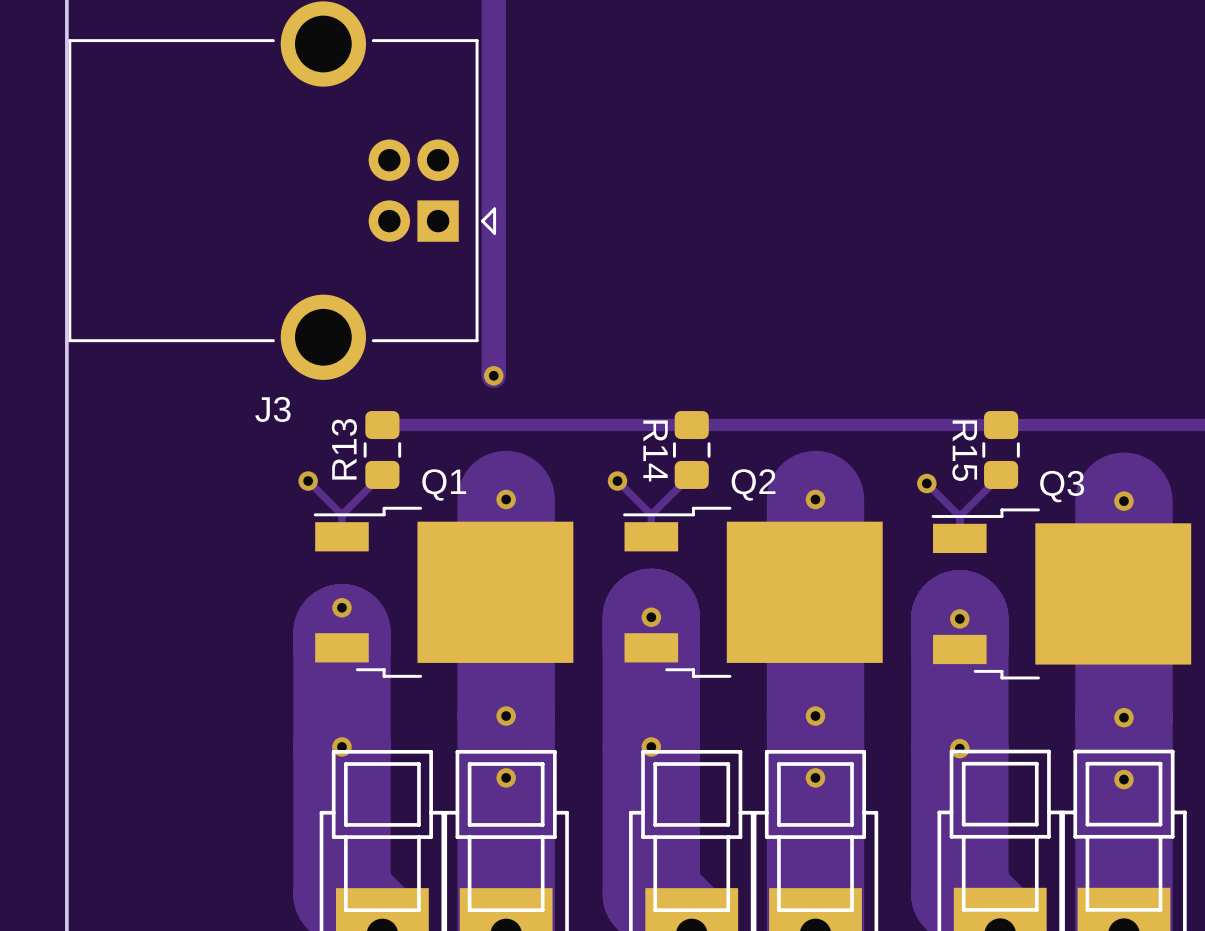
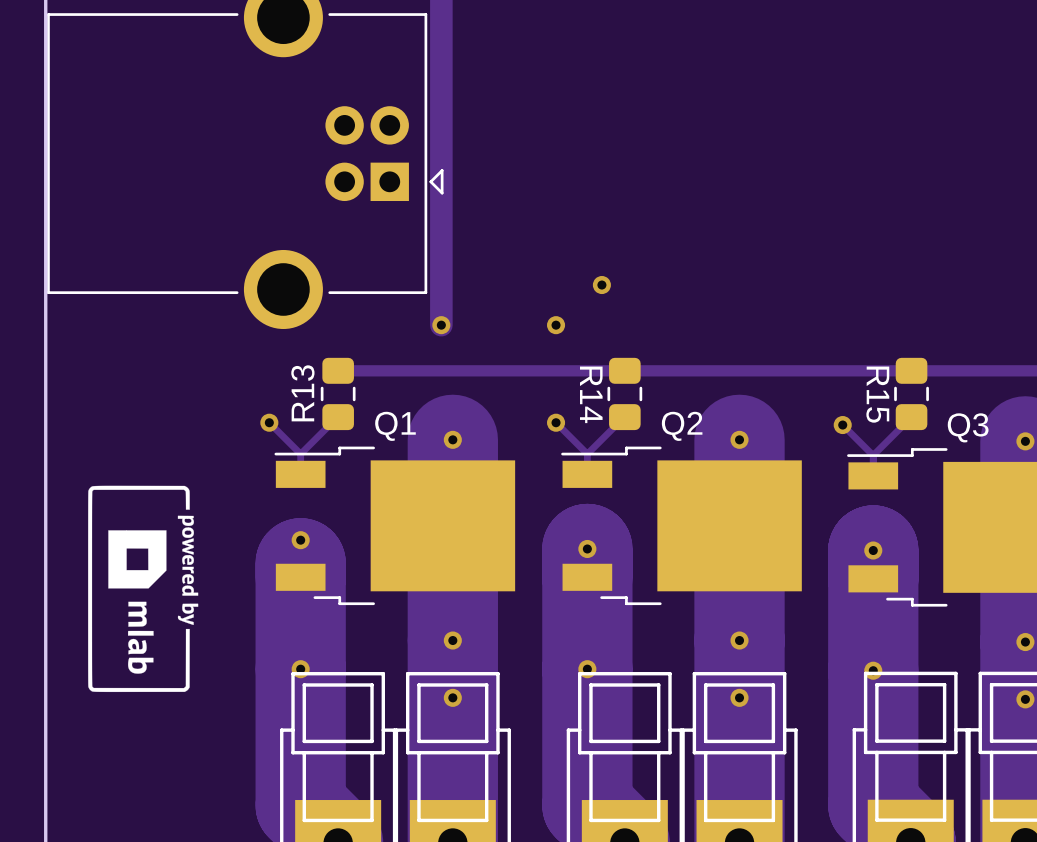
via: none -> (601, 285)
via: none -> (556, 325)
J3 name: J3 (272, 409) -> none
drawing: none -> [88, 485, 199, 693]

